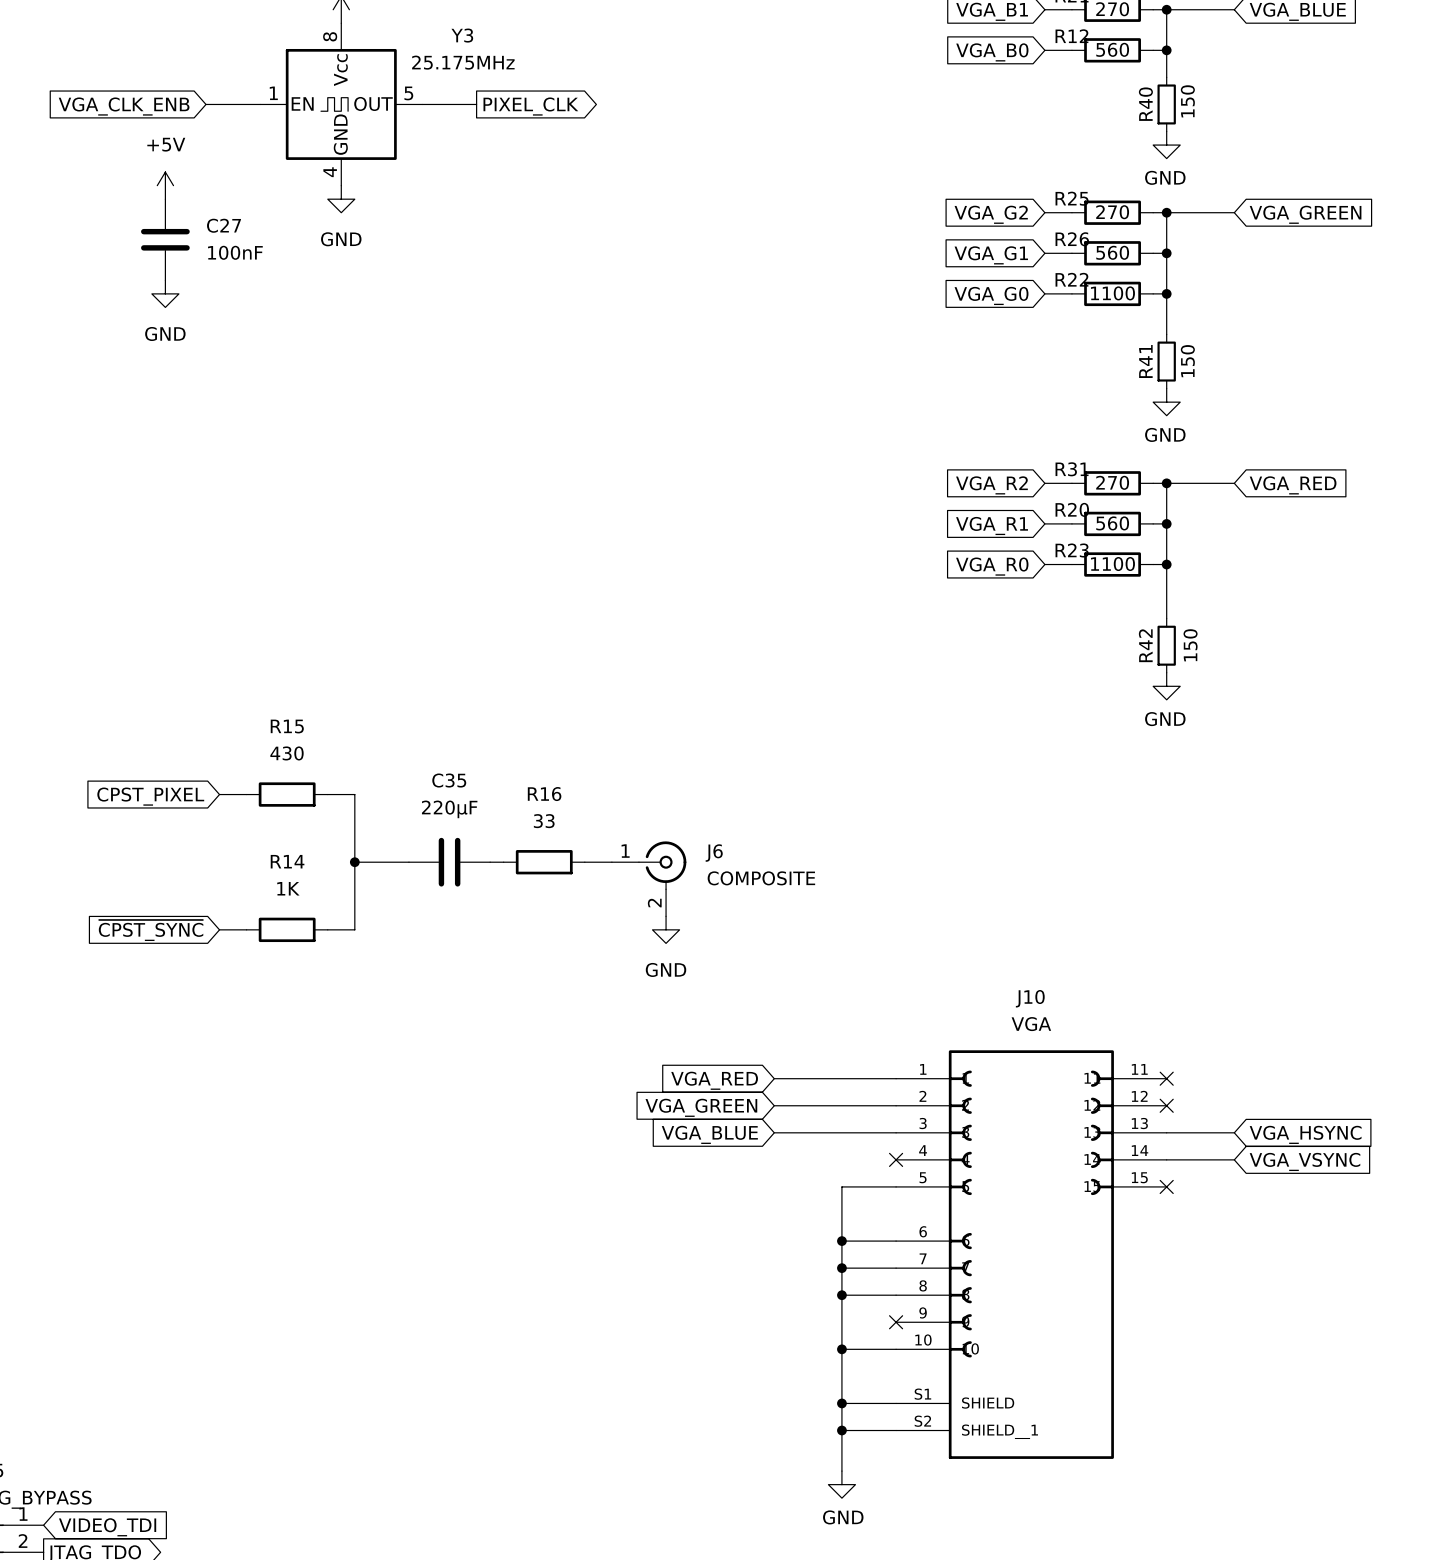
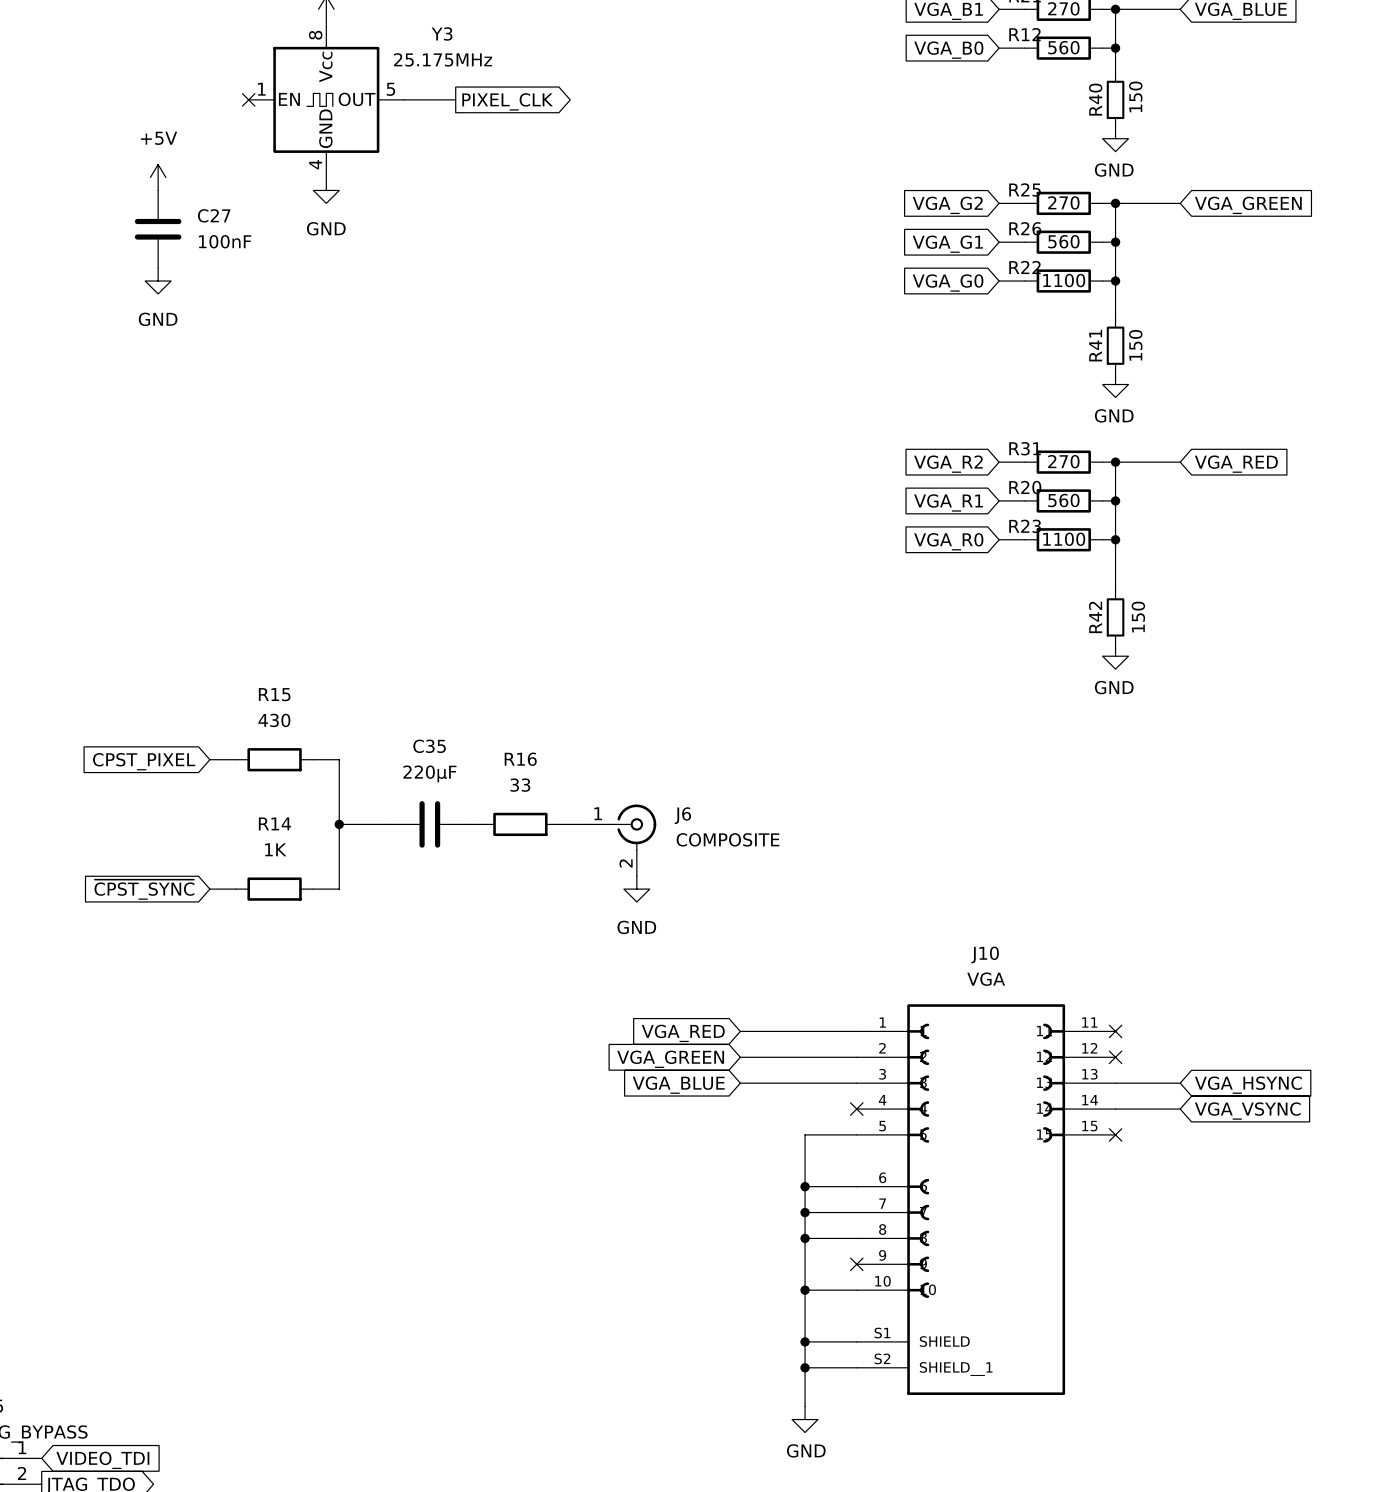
wire: (205, 104) (260, 104) -> none
no-connect mark: none -> (248, 99)
global label: VGA_CLK_ENB (124, 106) -> none

